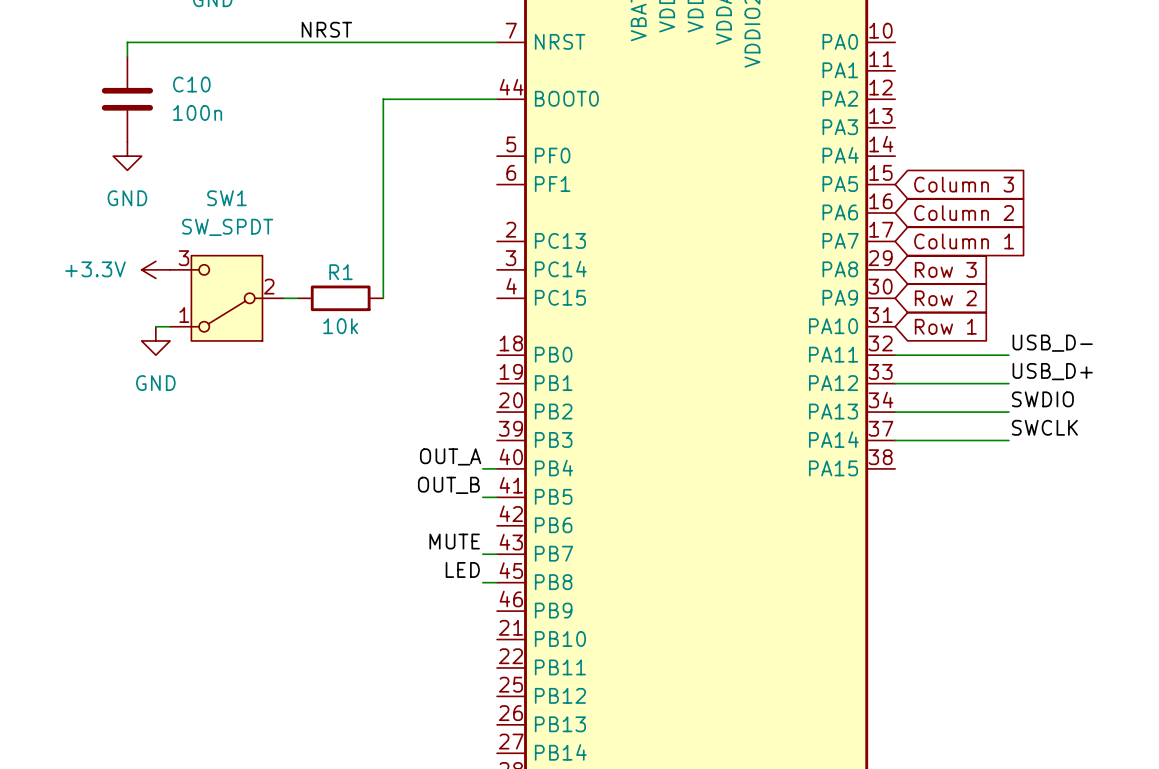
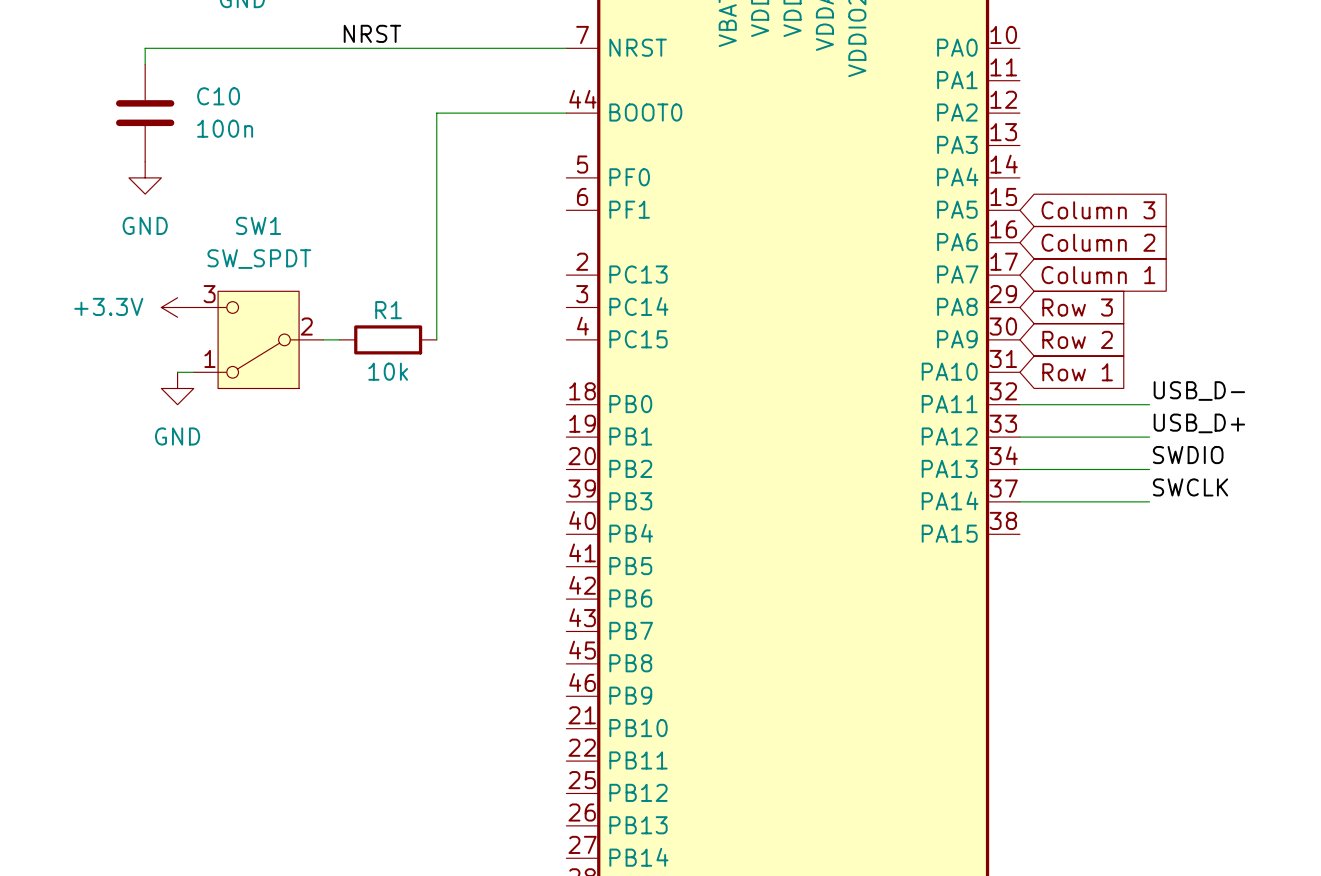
label: OUT_A (450, 456) -> none
wire: (482, 468) (497, 468) -> none
label: OUT_B (448, 485) -> none
wire: (482, 497) (497, 497) -> none
label: MUTE (454, 541) -> none
wire: (482, 554) (497, 554) -> none
label: LED (462, 569) -> none
wire: (482, 582) (497, 582) -> none

